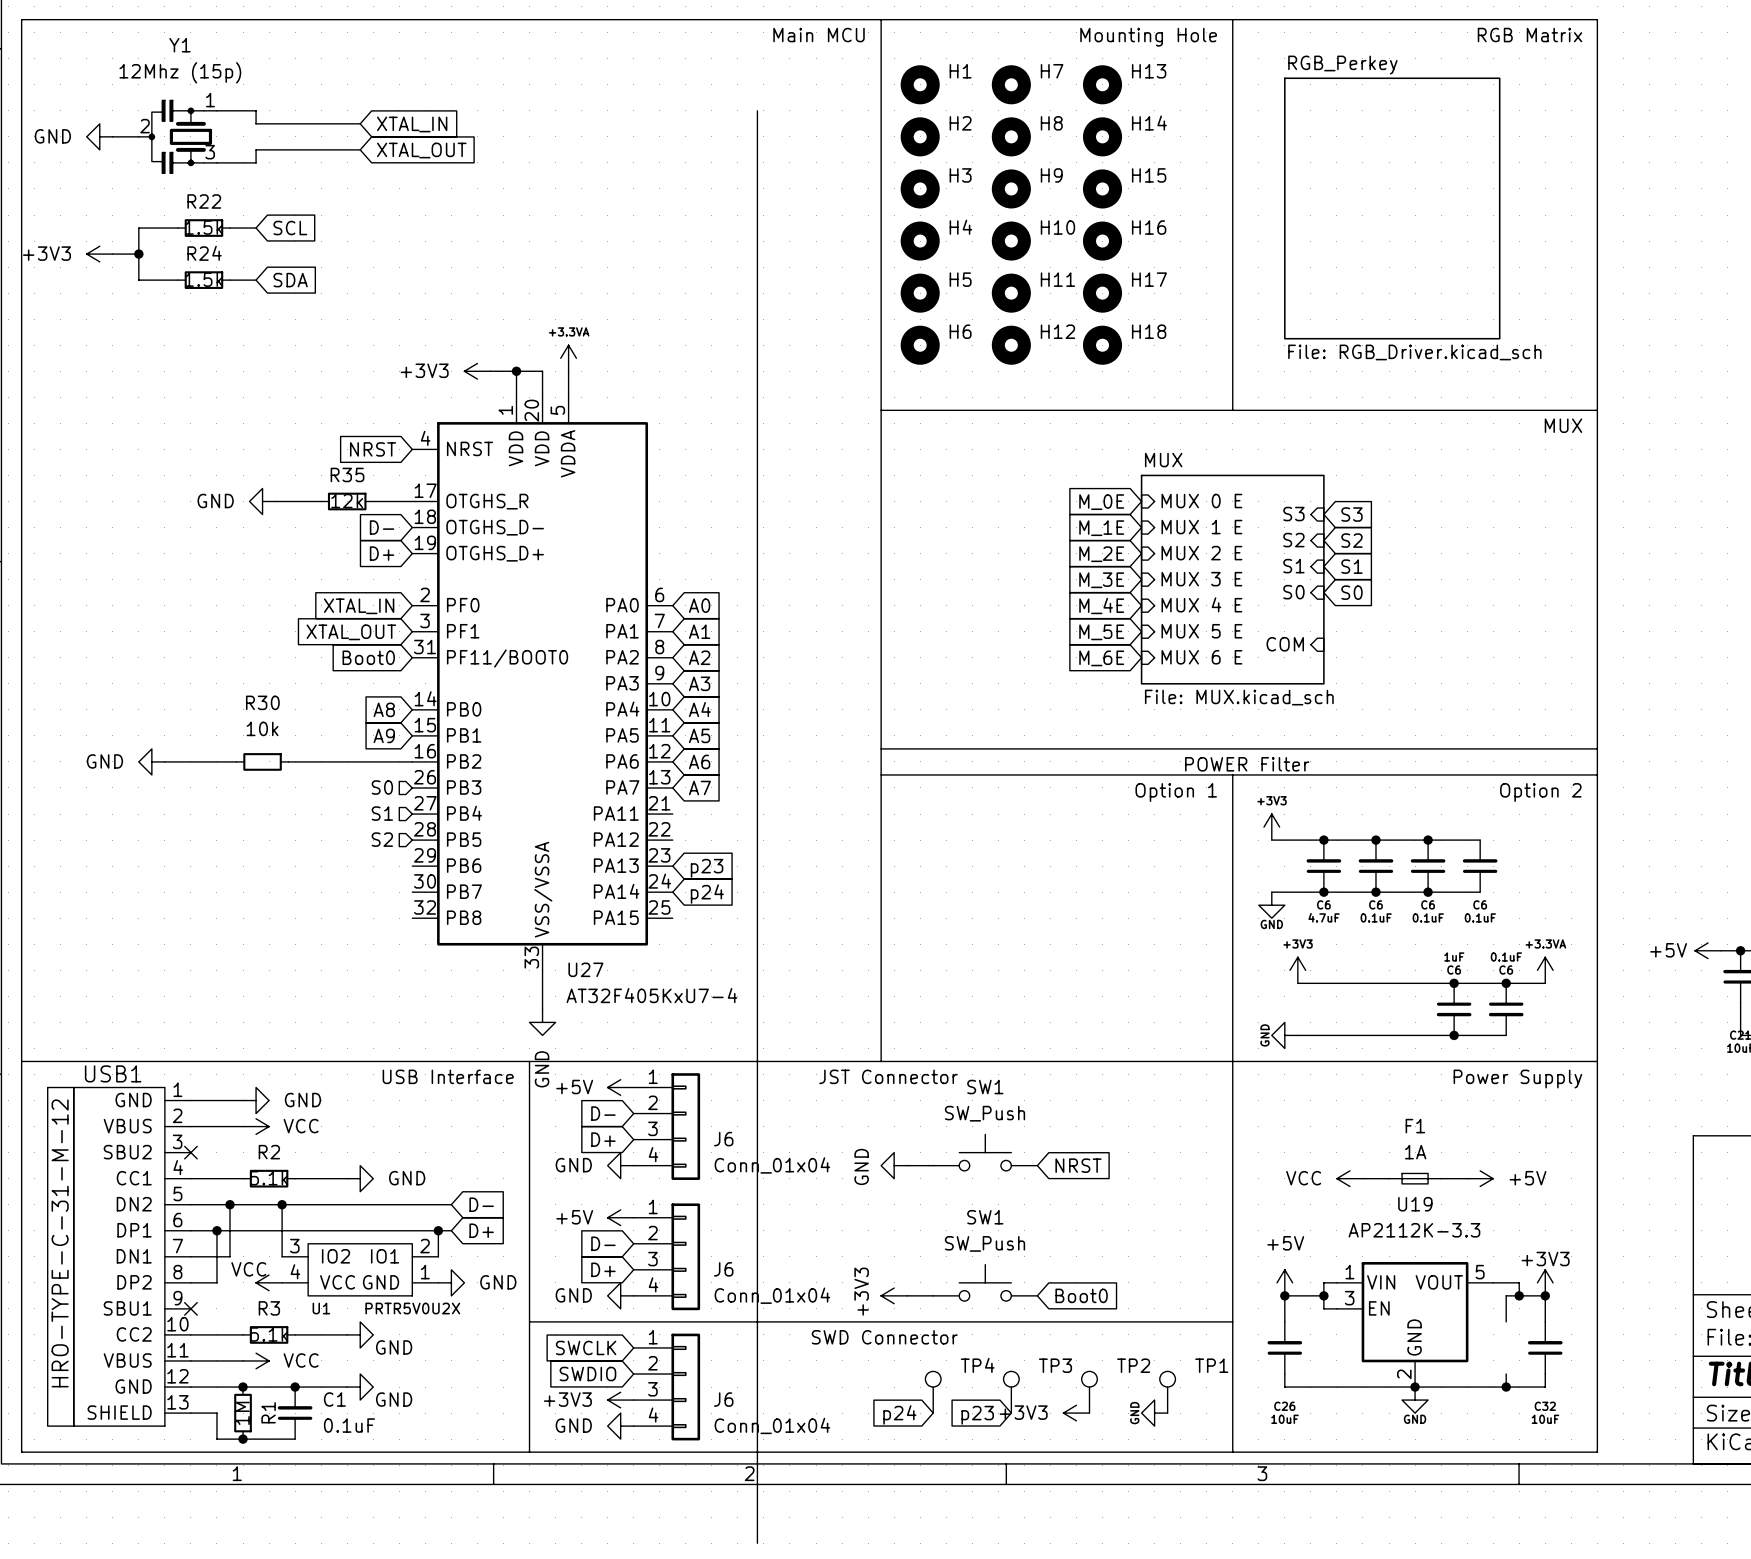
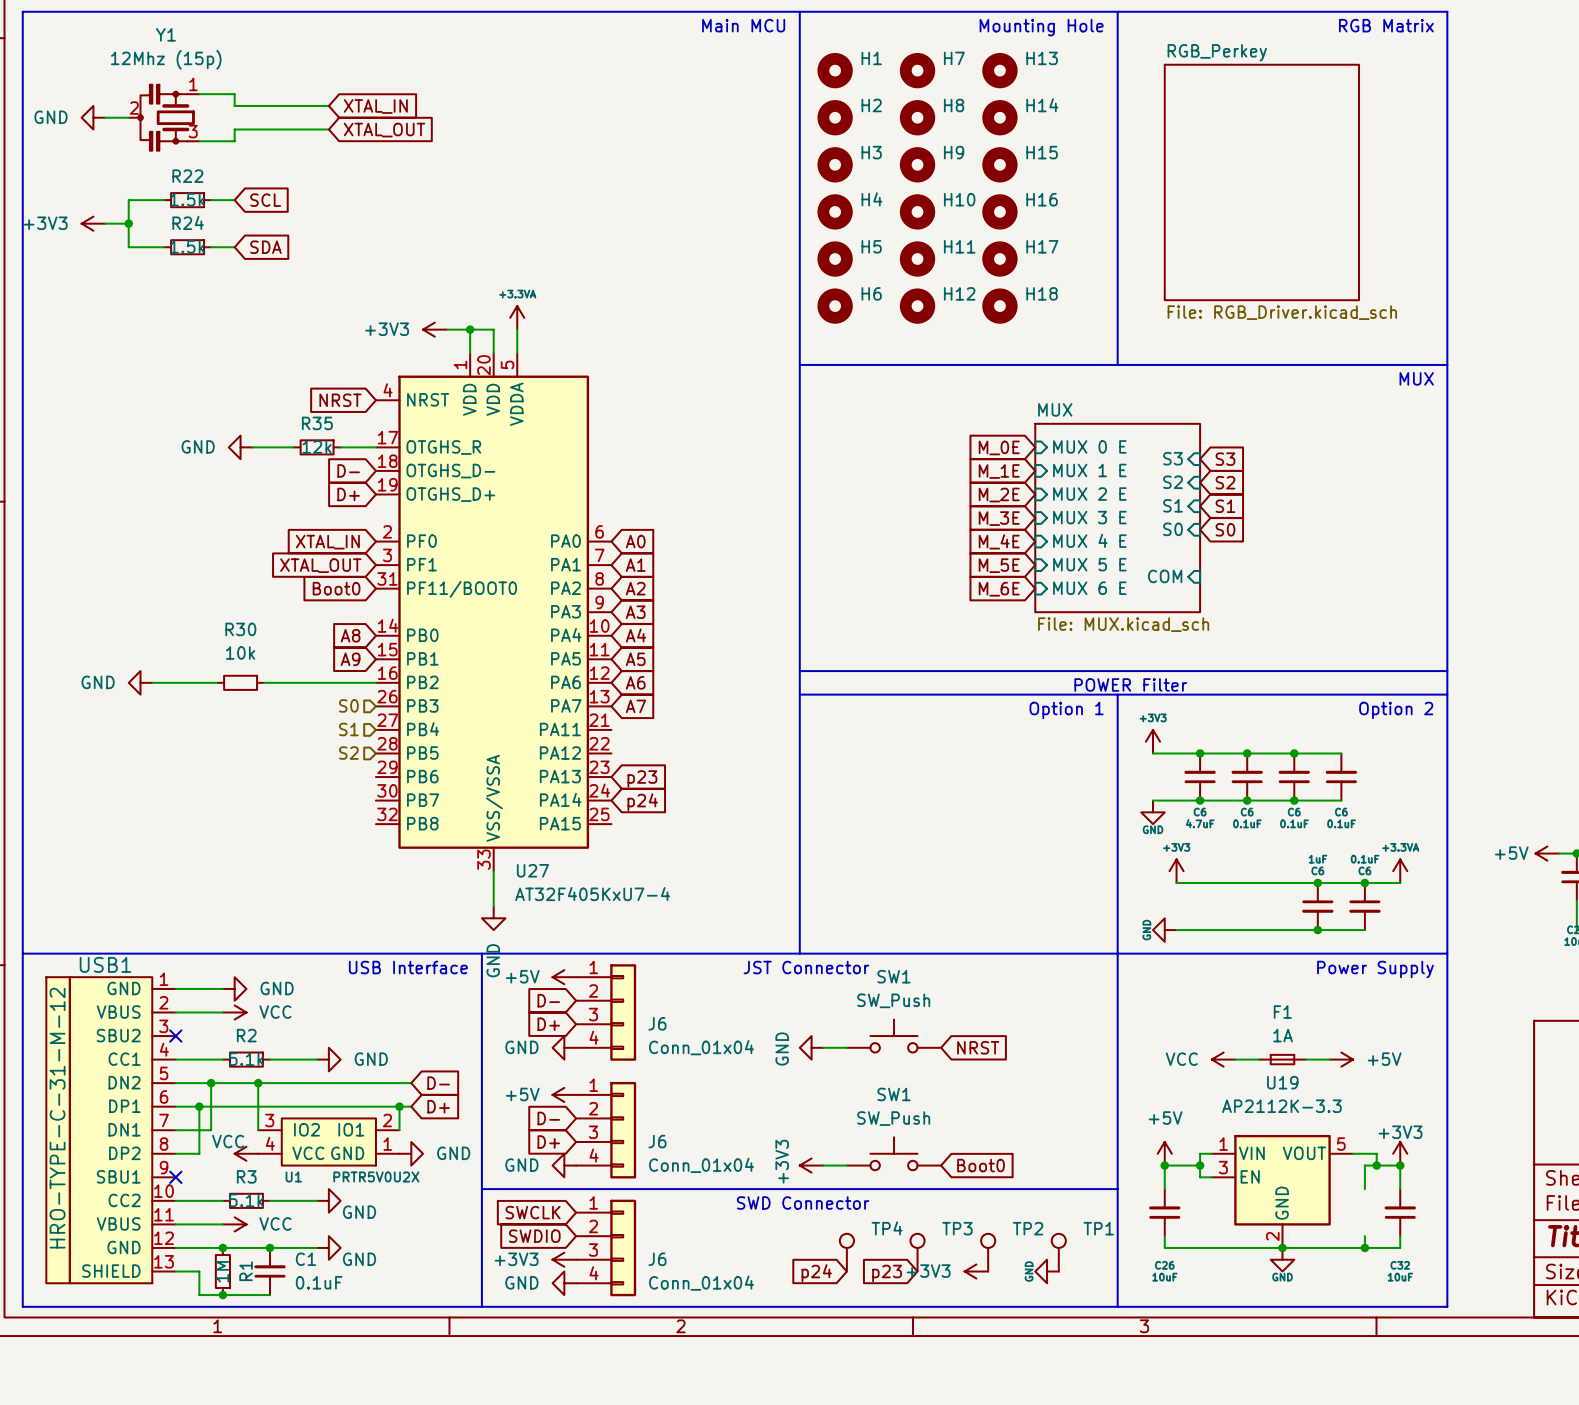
line: (757, 110) (757, 1543) -> none

